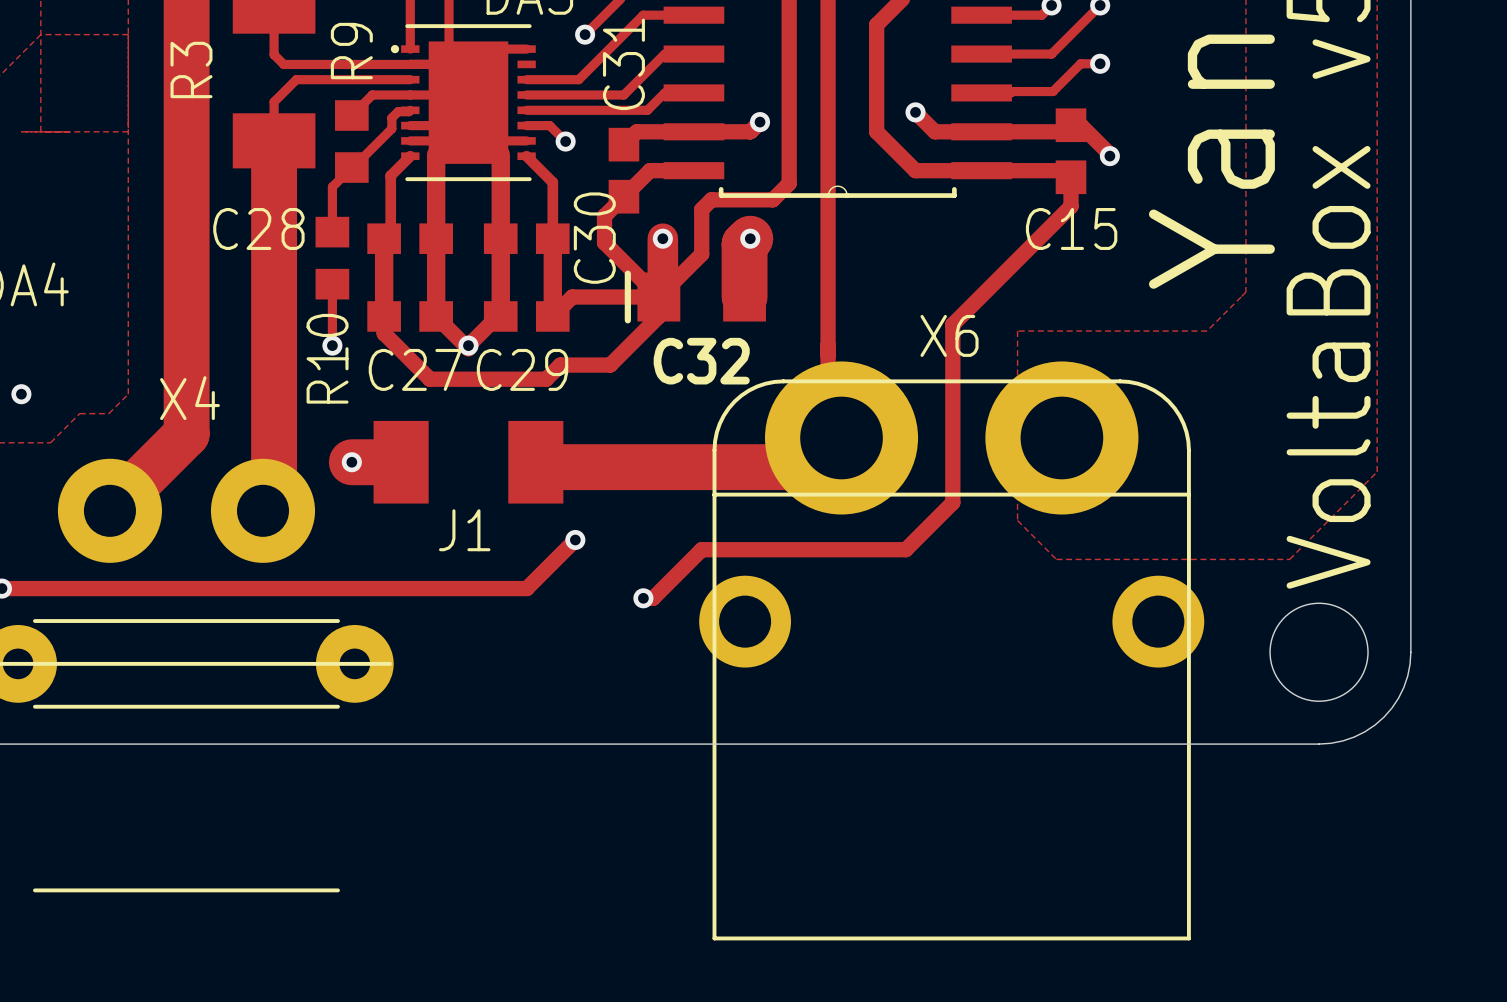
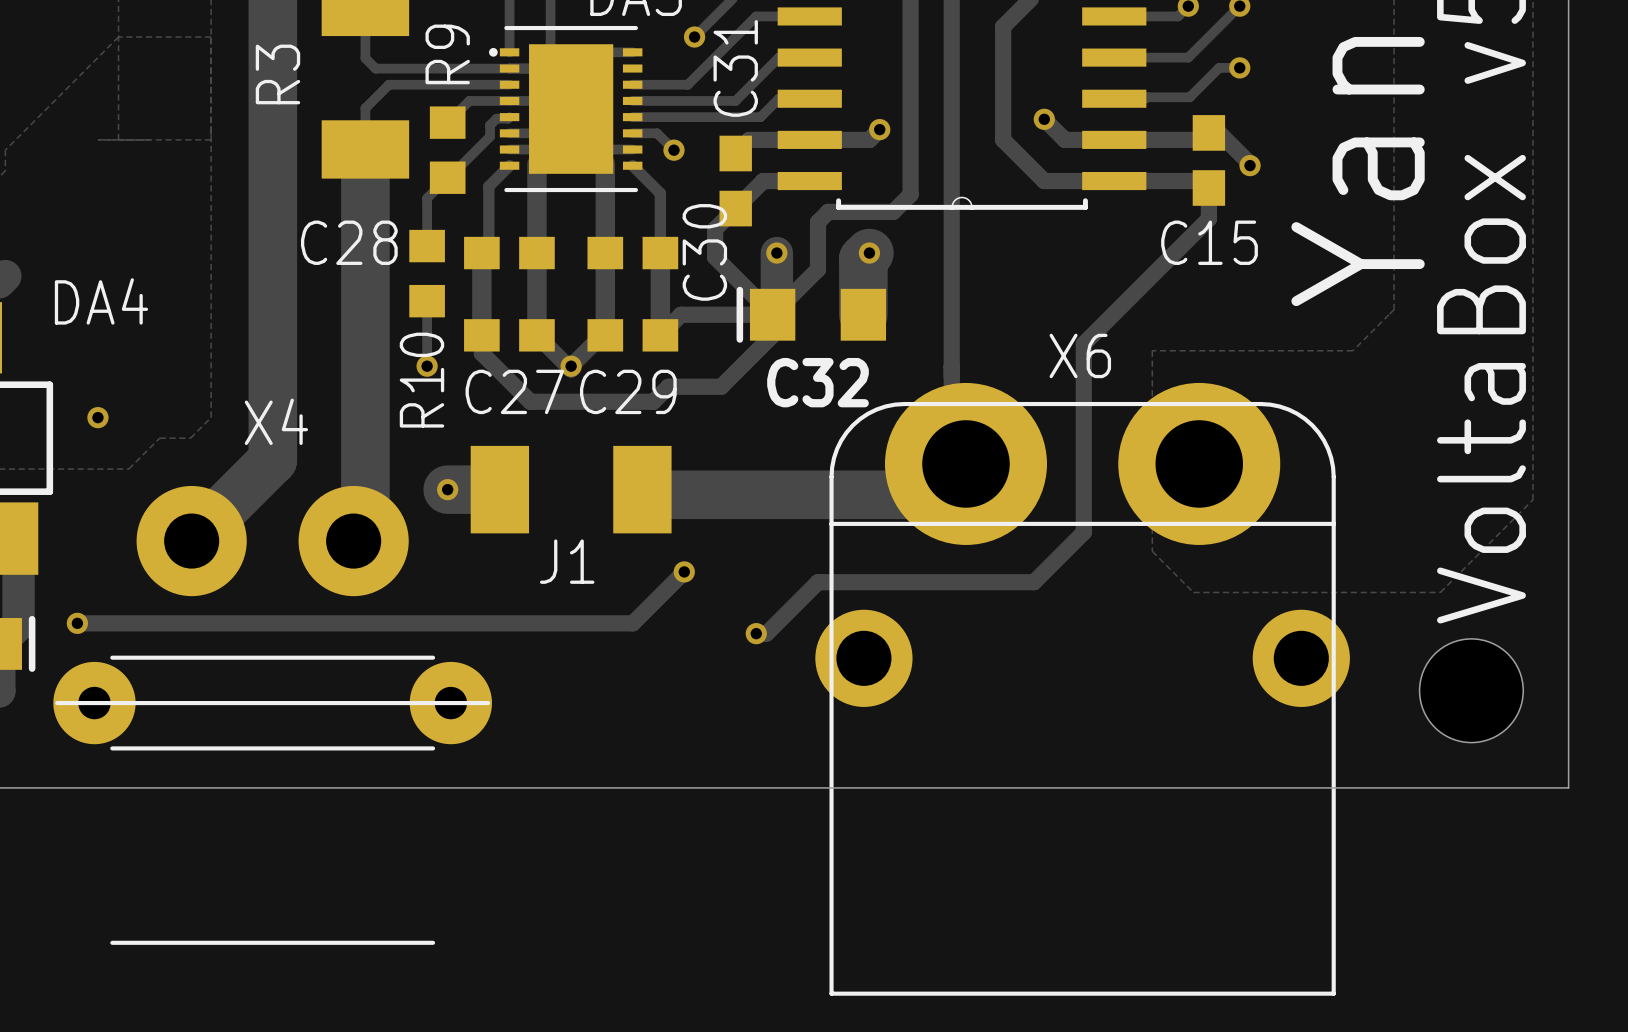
board edge: (1410, 652) (1407, 676) (1403, 687) (1391, 708) (1383, 717) (1374, 725) (1354, 737) (1342, 740) (1319, 744) -> (1568, 690) (1568, 787) (1471, 787)

